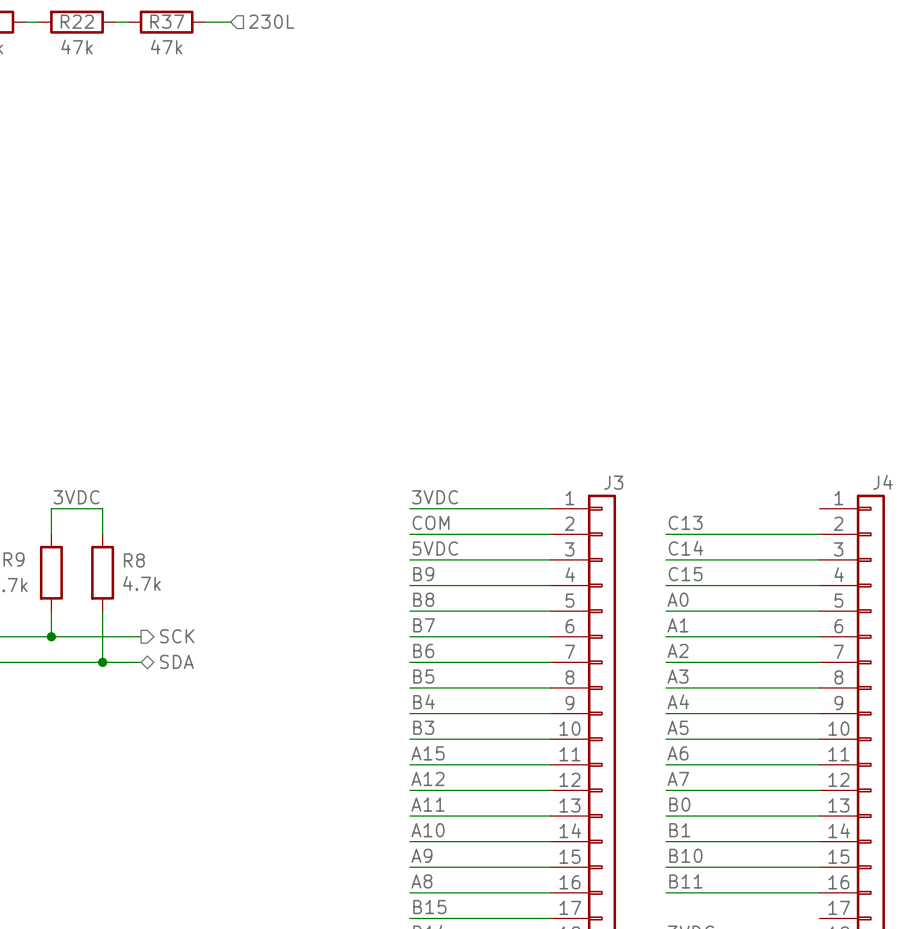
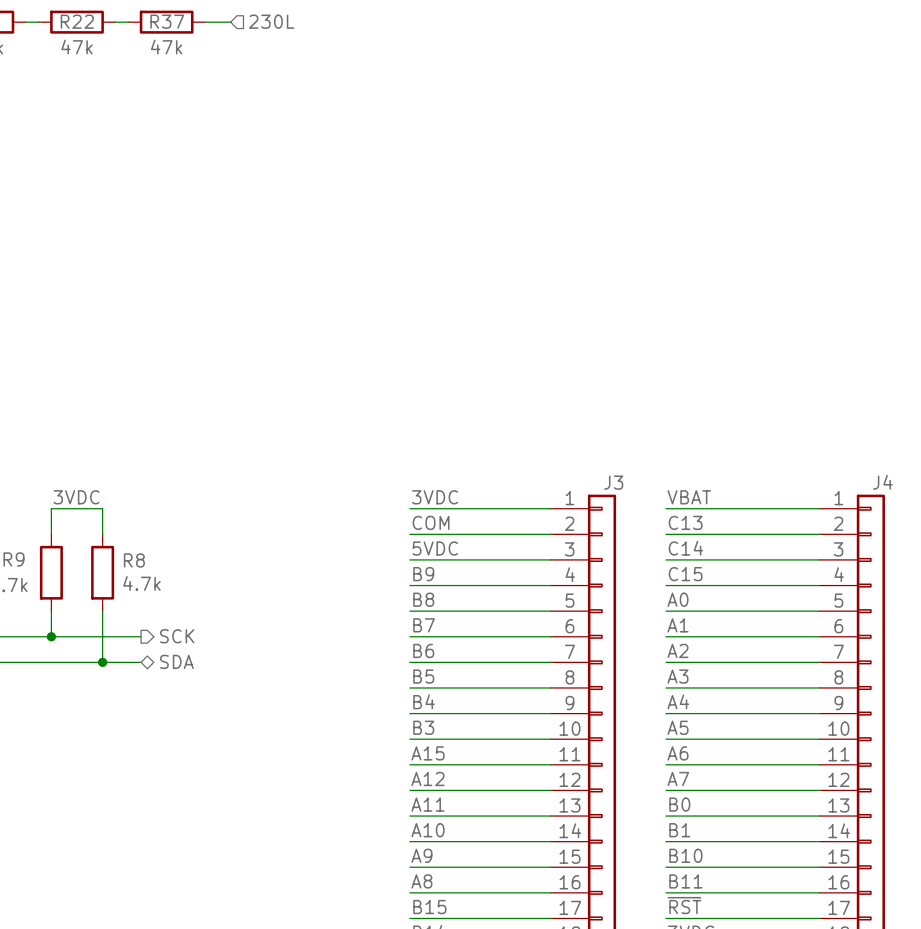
label: none -> VBAT (689, 497)
wire: none -> (666, 508) (819, 508)
label: none -> ~{RST} (684, 905)
wire: none -> (666, 918) (819, 918)

